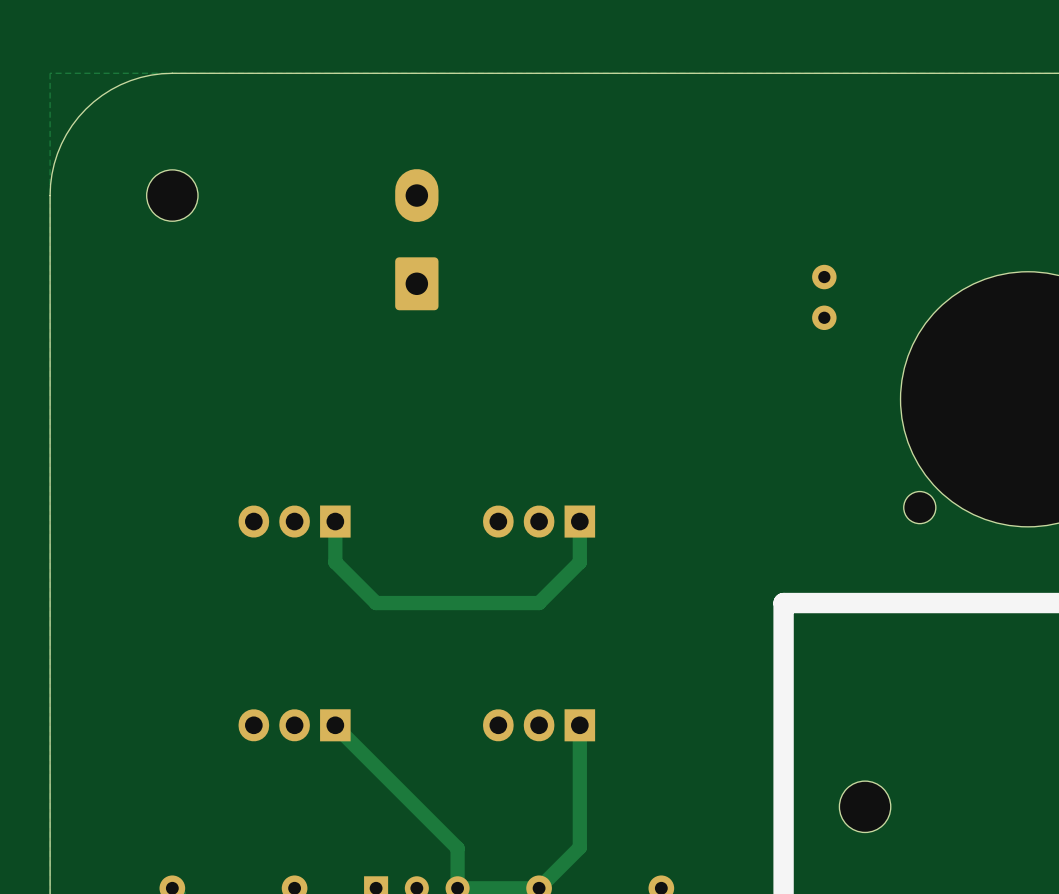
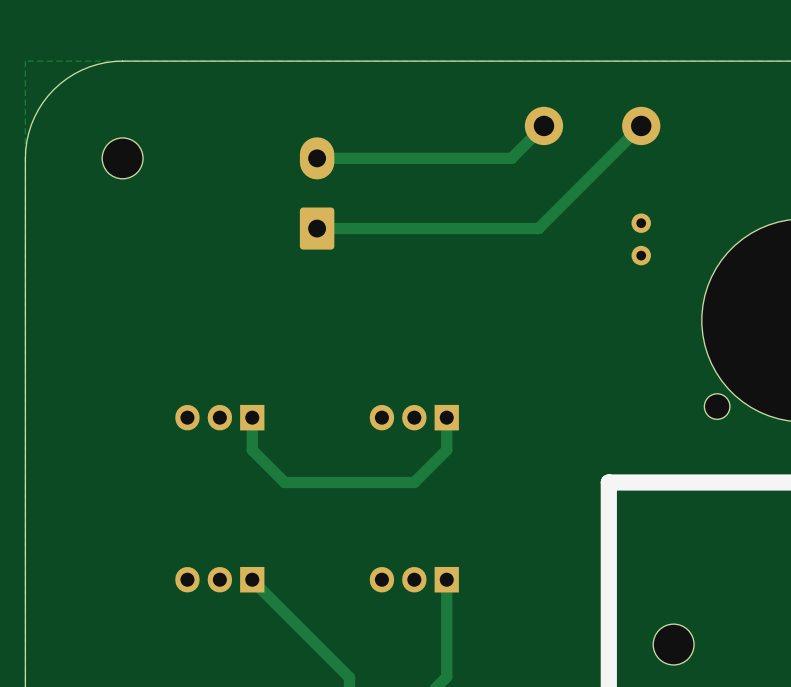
track: none -> (543, 125) (511, 158) (317, 158)
part: none -> (543, 125)
track: none -> (641, 125) (538, 228) (317, 228)
part: none -> (641, 125)

